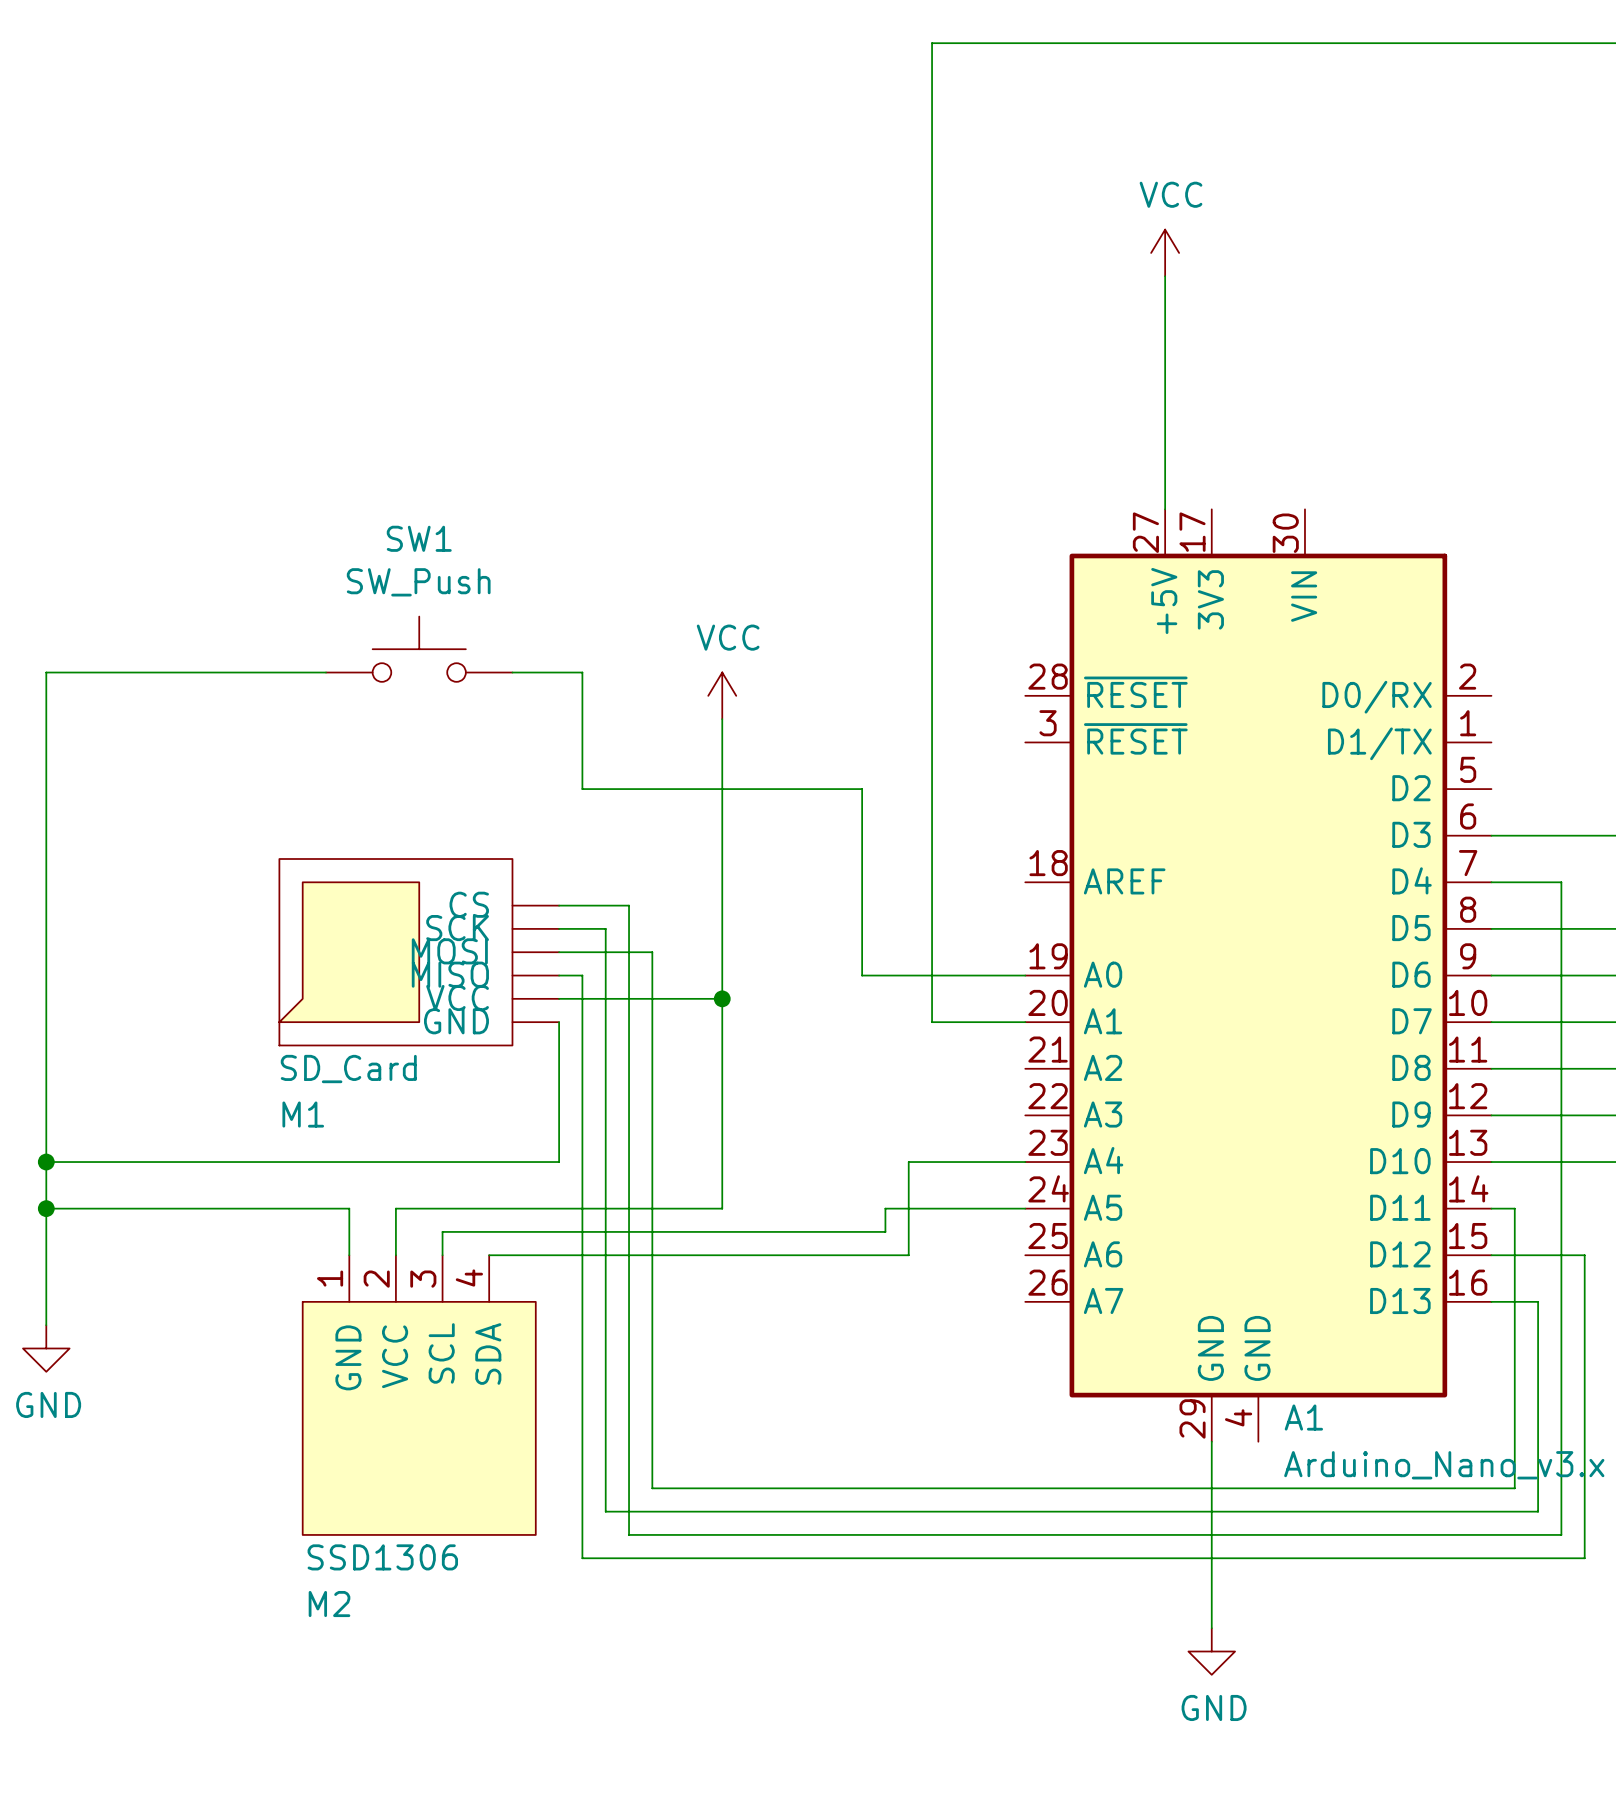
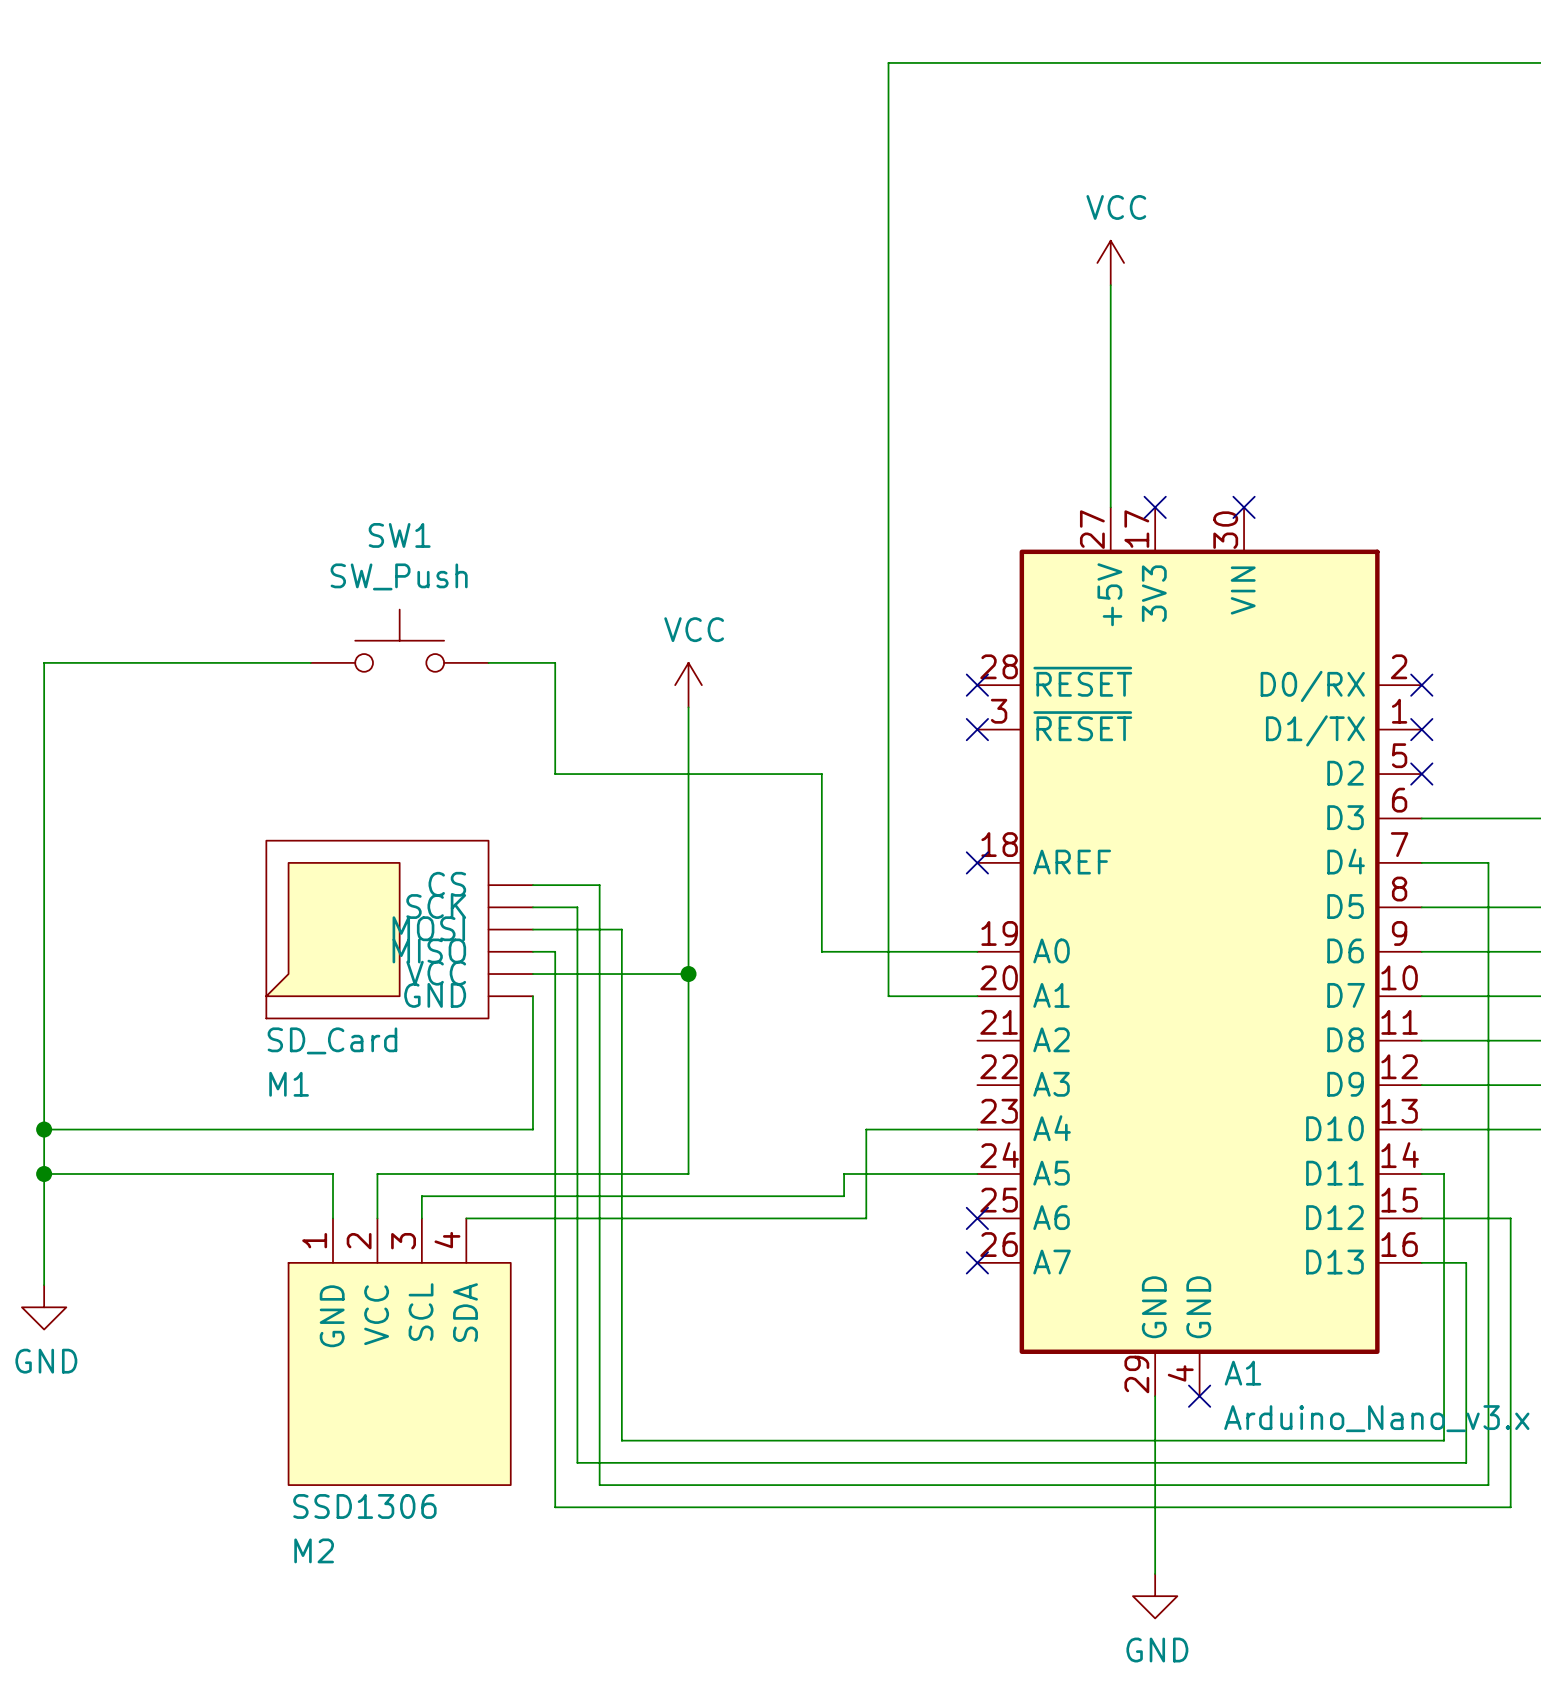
no-connect mark: none -> (1155, 507)
no-connect mark: none -> (1244, 507)
no-connect mark: none -> (977, 685)
no-connect mark: none -> (1421, 685)
no-connect mark: none -> (977, 729)
no-connect mark: none -> (1421, 729)
no-connect mark: none -> (1421, 774)
no-connect mark: none -> (977, 862)
no-connect mark: none -> (977, 1218)
no-connect mark: none -> (977, 1262)
no-connect mark: none -> (1199, 1396)

